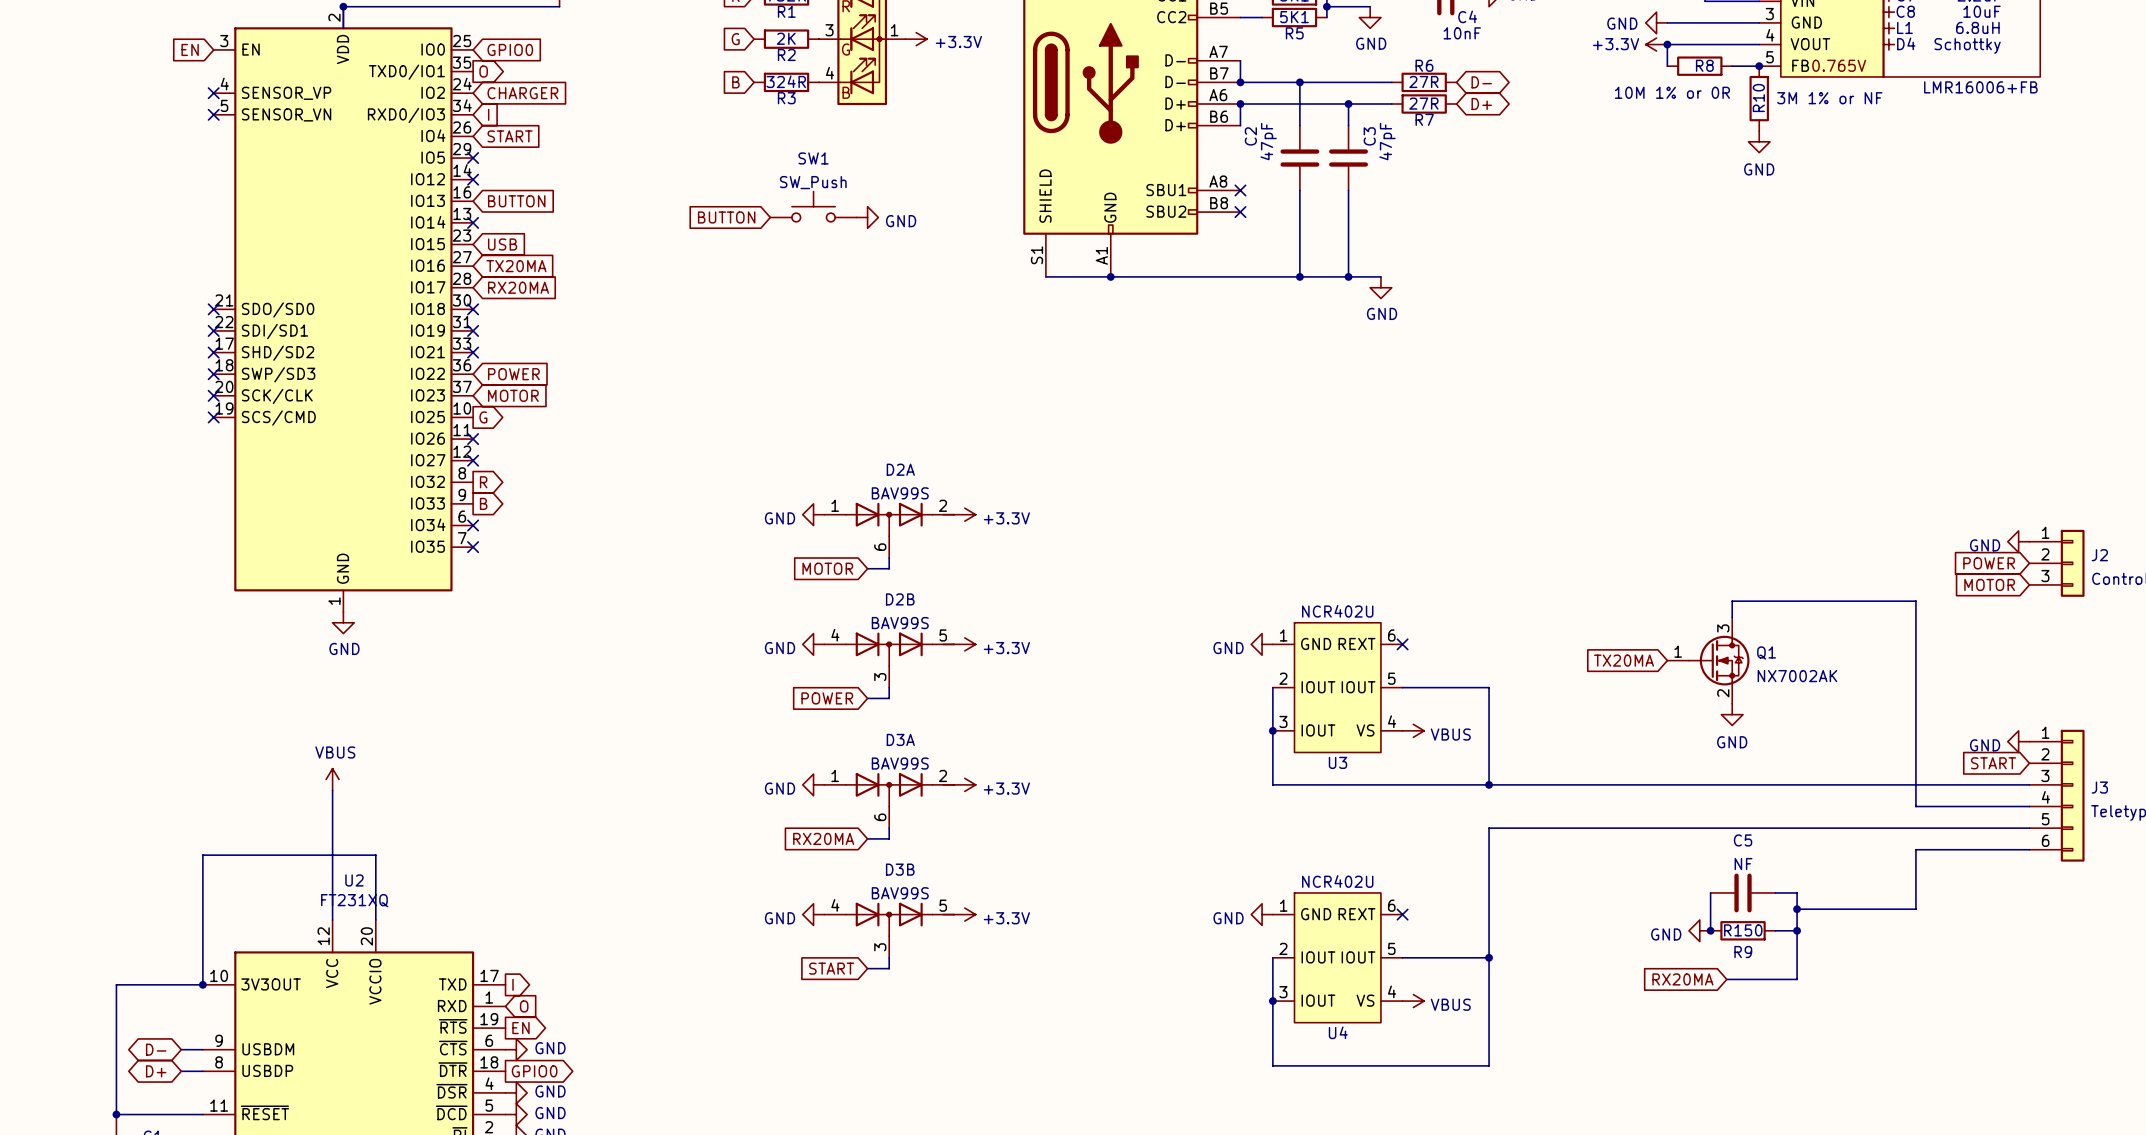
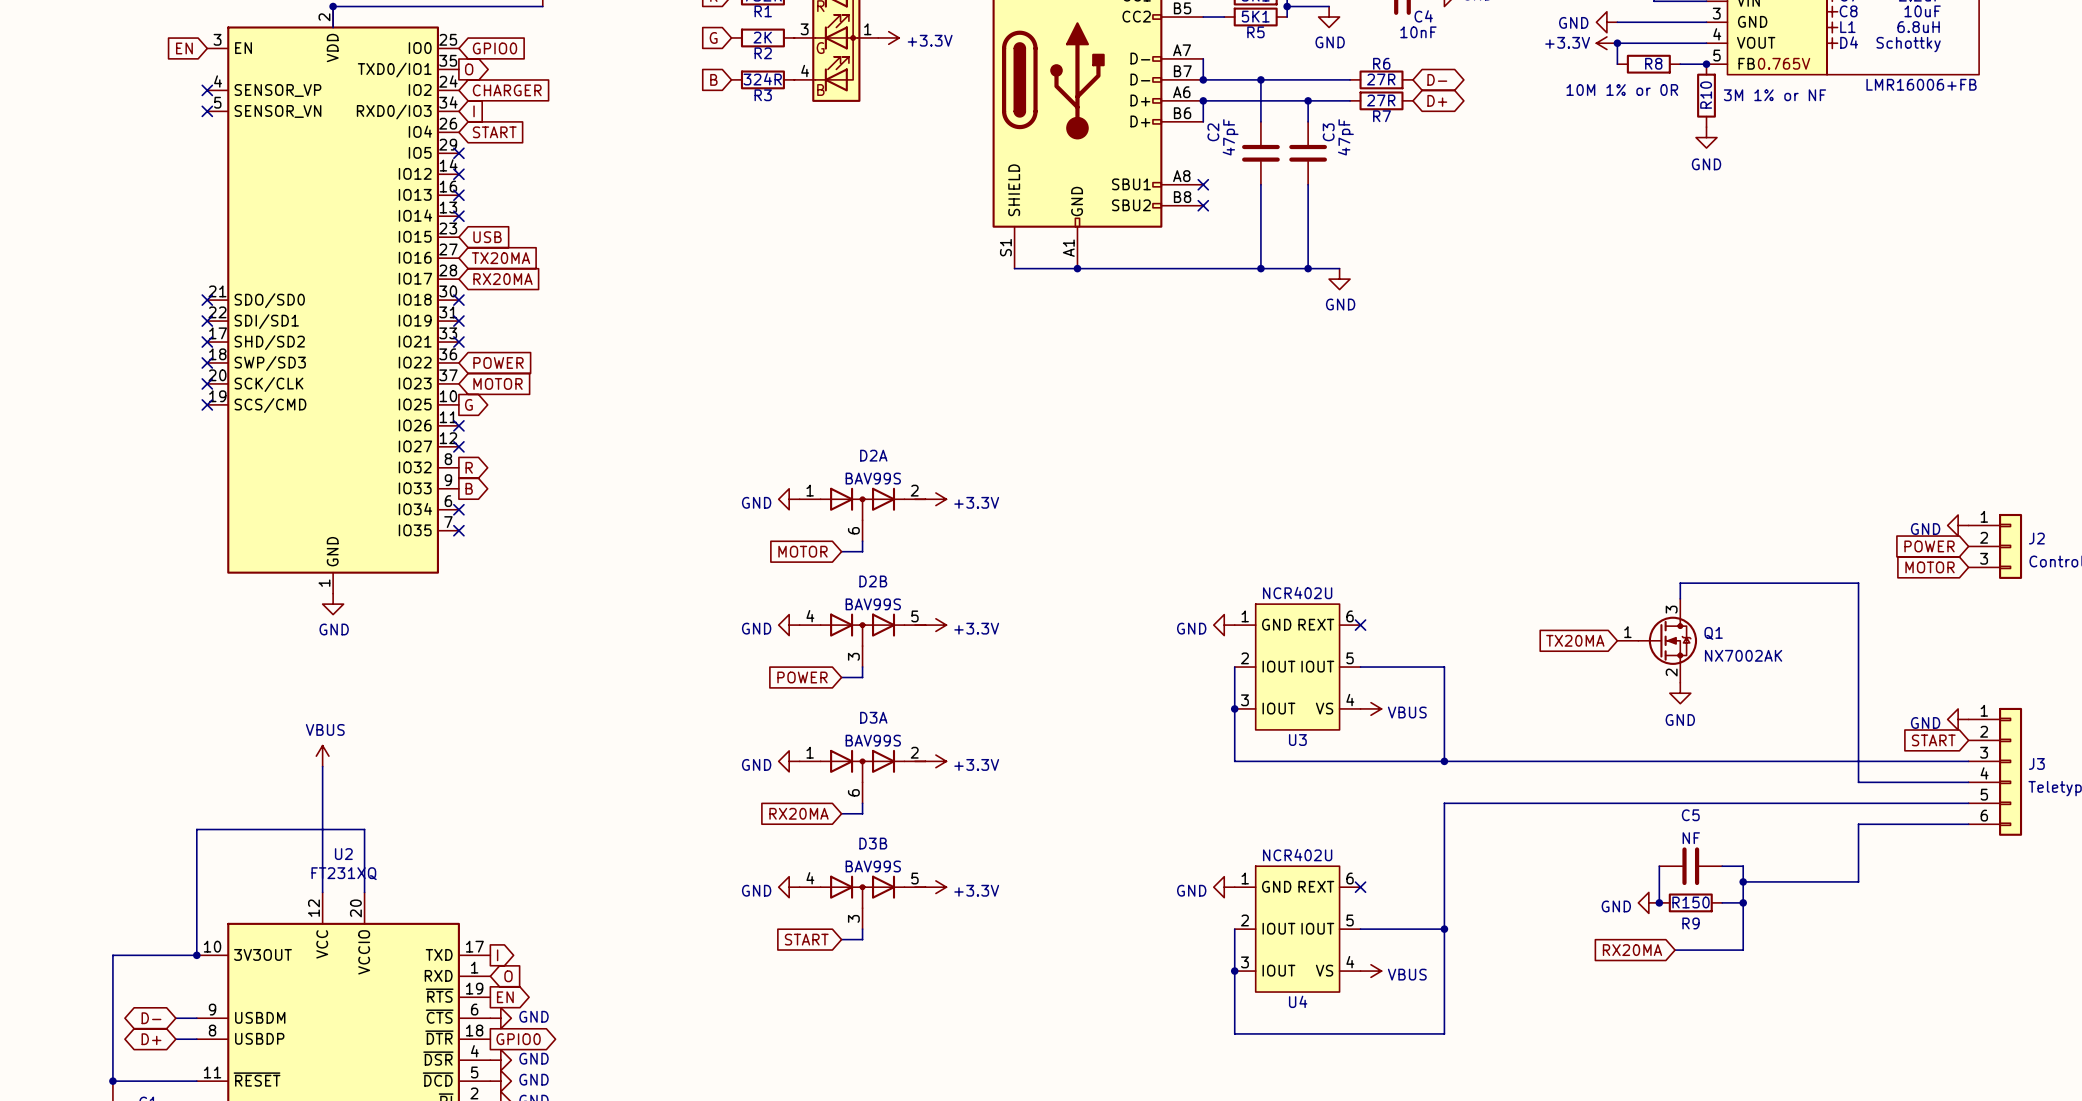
no-connect mark: none -> (458, 195)
global label: BUTTON (516, 201) -> none
SW1: SW_Push (813, 206) -> none
global label: BUTTON (726, 217) -> none
power symbol: GND (867, 217) -> none

